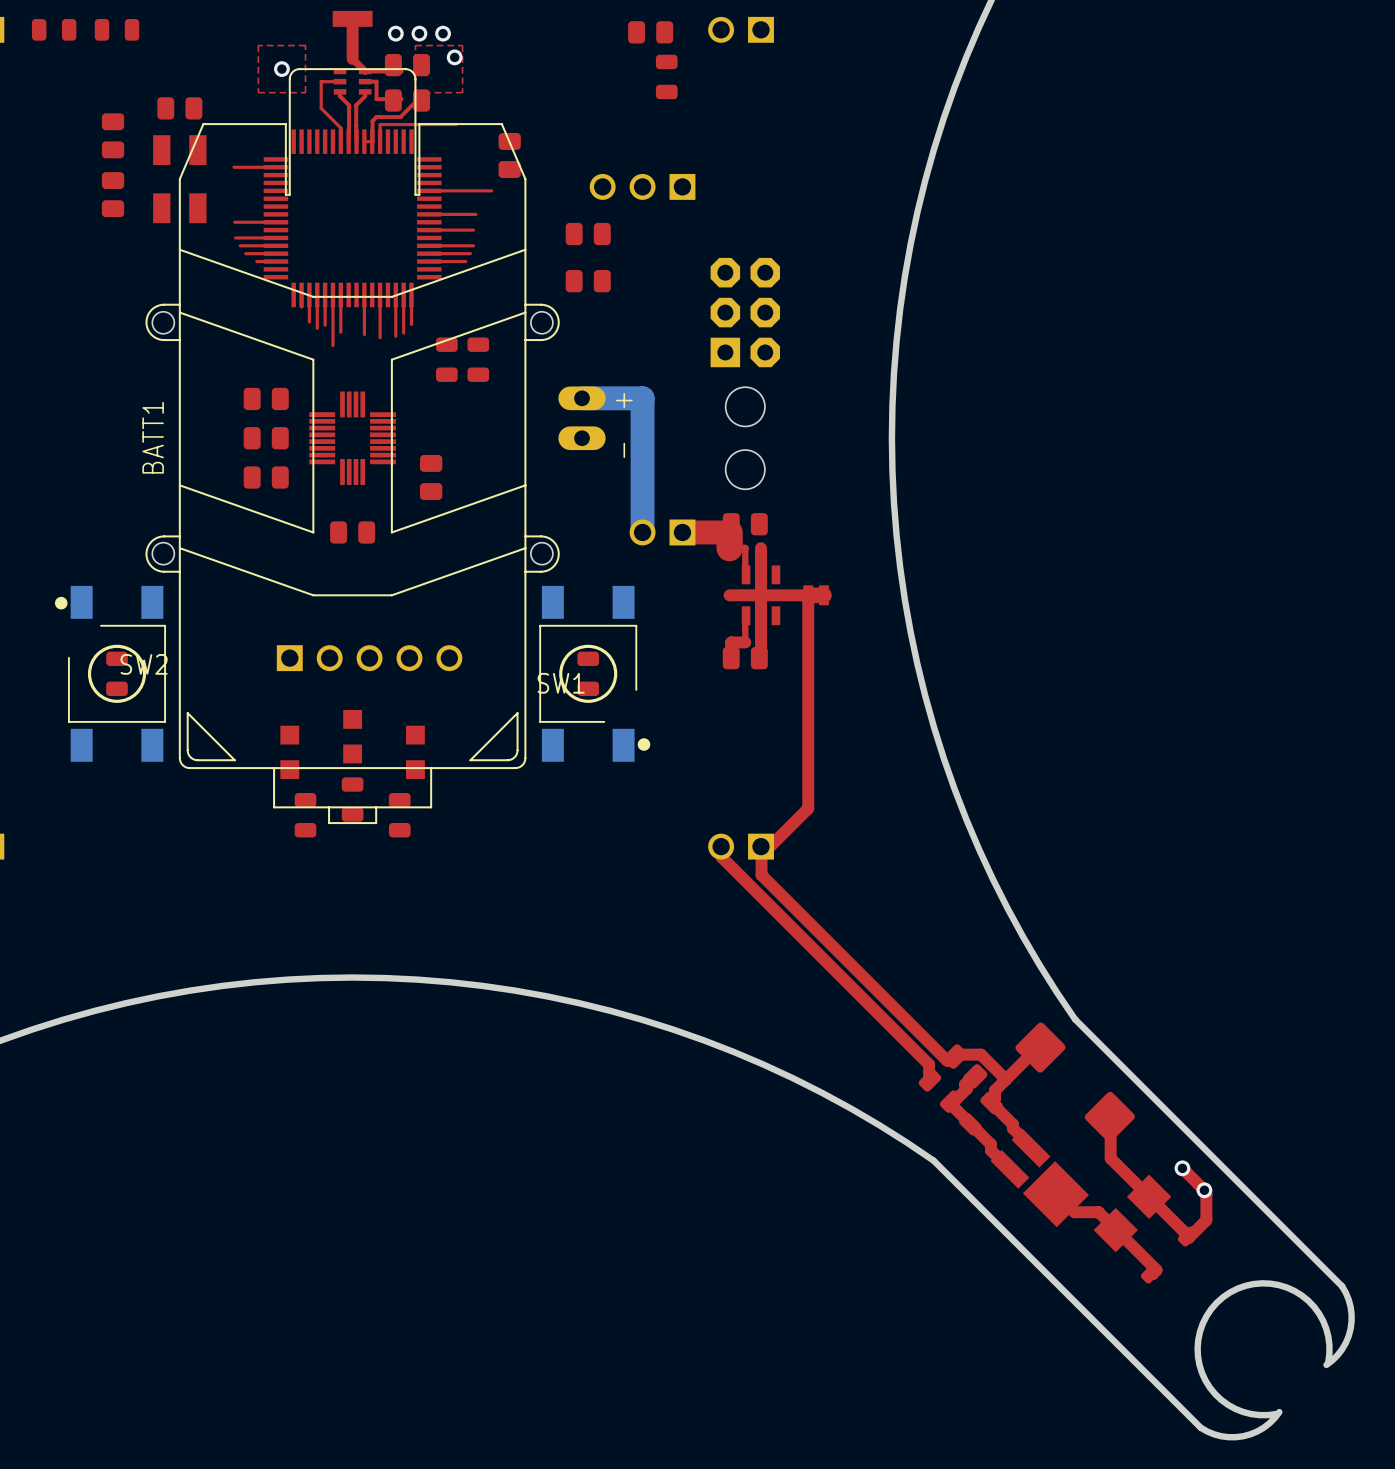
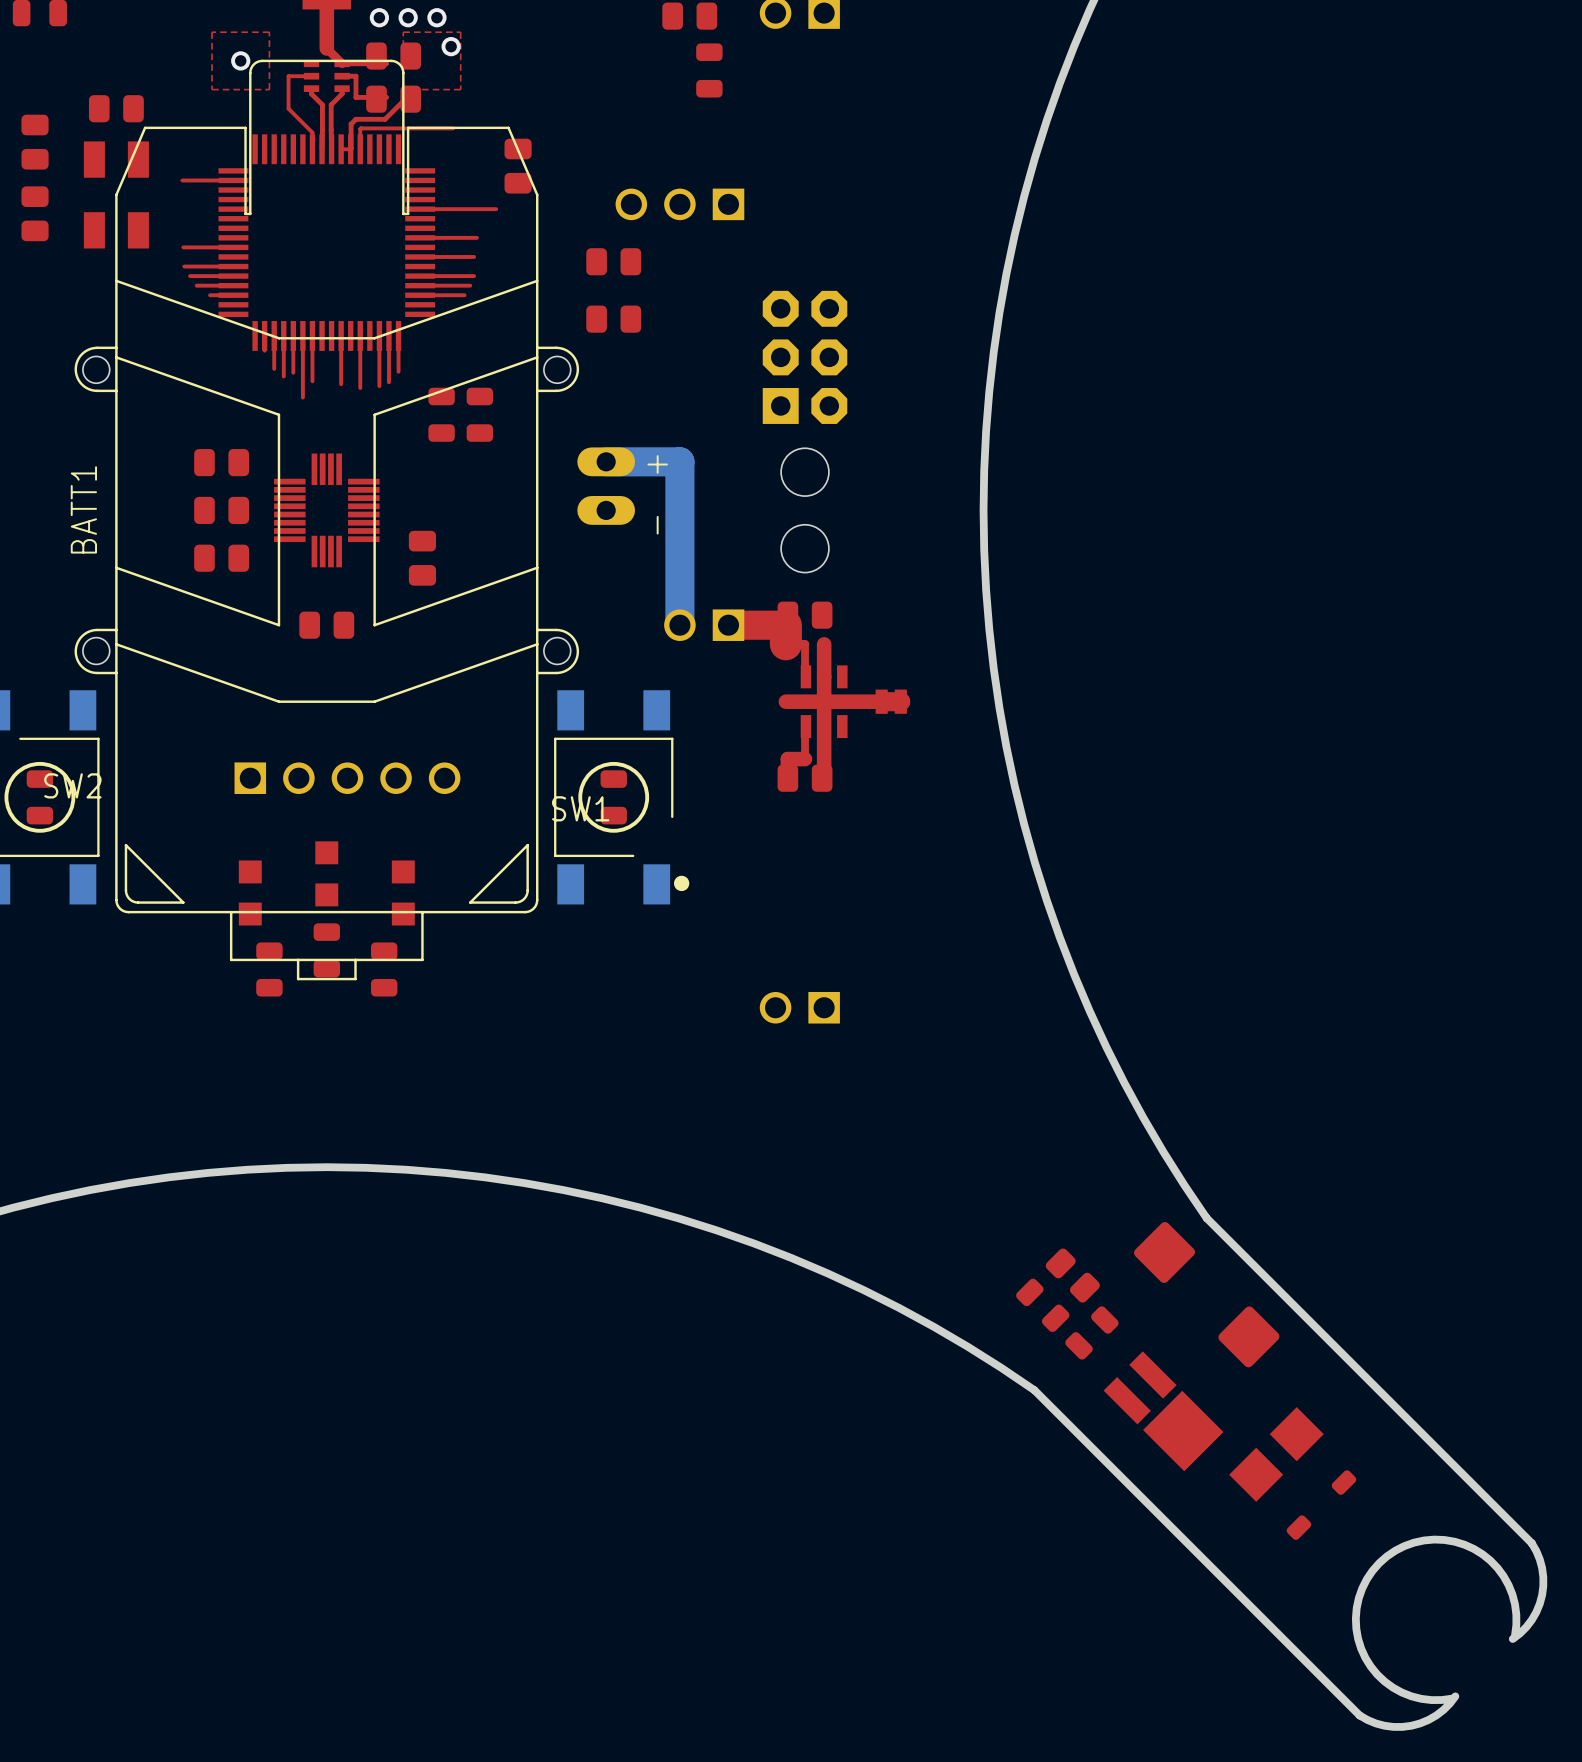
top track: (808, 595) (808, 808) (761, 855) -> none
top track: (721, 846) (721, 857) (929, 1064) (929, 1080) -> none
top track: (761, 846) (761, 875) (947, 1060) (951, 1060) (957, 1054) (980, 1054) (1005, 1079) -> none
top track: (1040, 1047) (1038, 1046) (994, 1090) (994, 1098) (991, 1103) (1012, 1124) (1012, 1128) (1031, 1148) -> none
top track: (975, 1076) (975, 1074) (965, 1084) (967, 1088) (955, 1100) (951, 1101) (953, 1106) (990, 1144) (990, 1150) (1009, 1169) -> none
top track: (1109, 1116) (1110, 1158) (1188, 1238) (1206, 1220) (1206, 1194) (1182, 1168) -> none
via: (1182, 1168) -> none
via: (1204, 1190) -> none
top track: (1055, 1194) (1074, 1212) (1098, 1212) (1156, 1270) (1150, 1273) -> none

